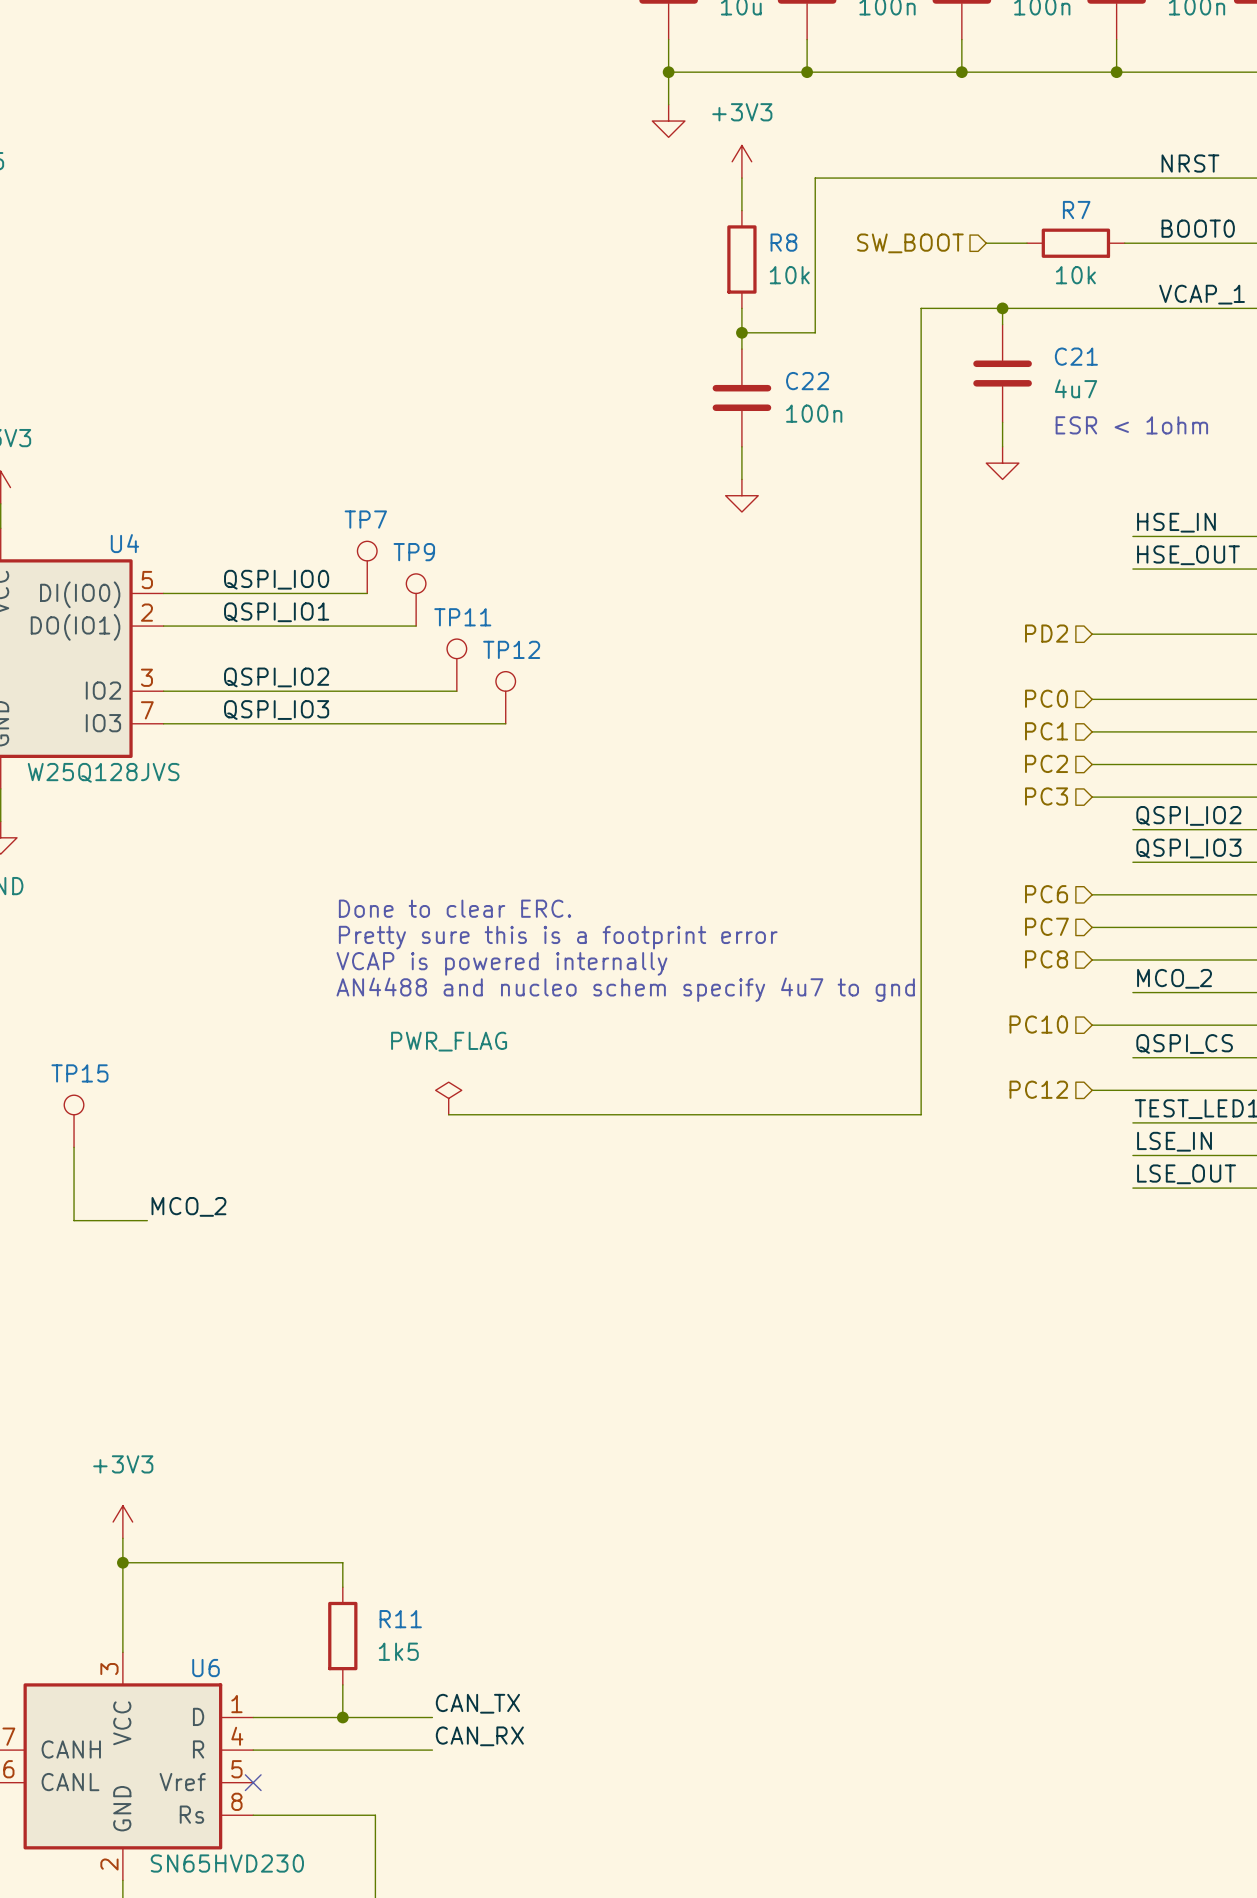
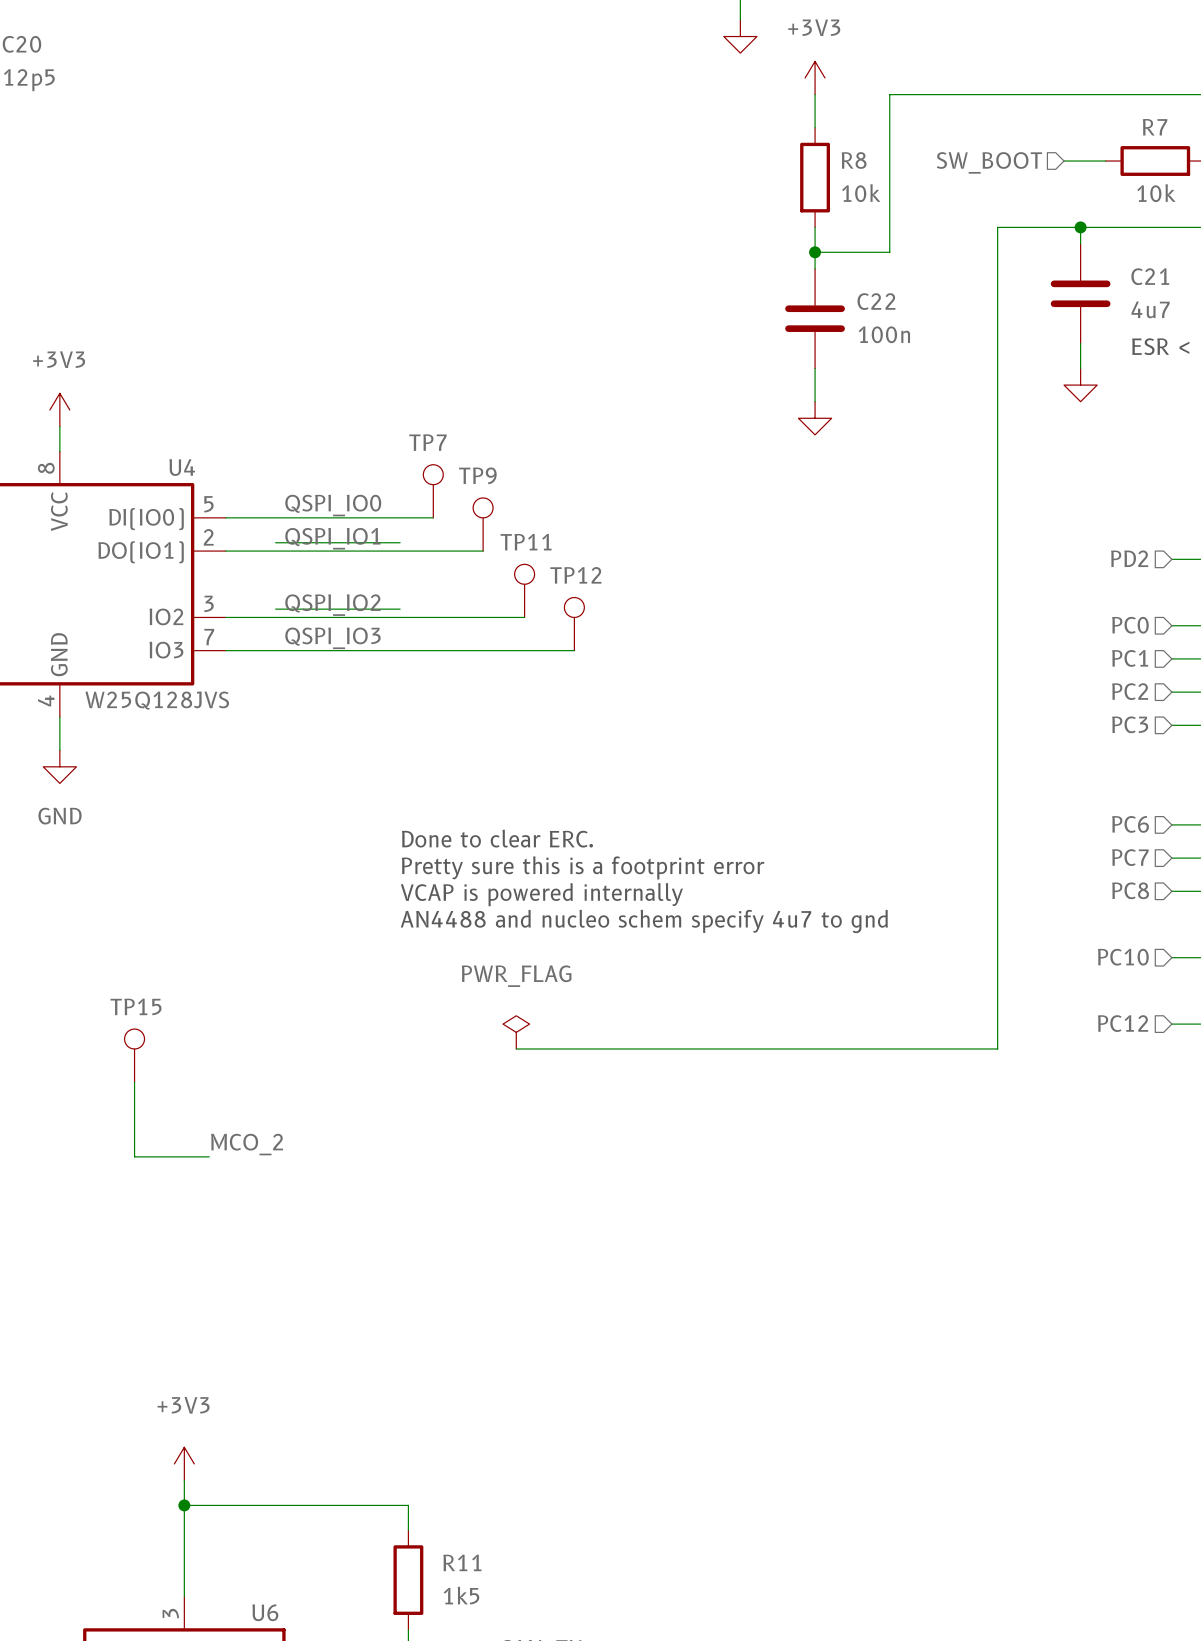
wire: none -> (275, 542) (400, 542)
wire: none -> (275, 609) (400, 609)

